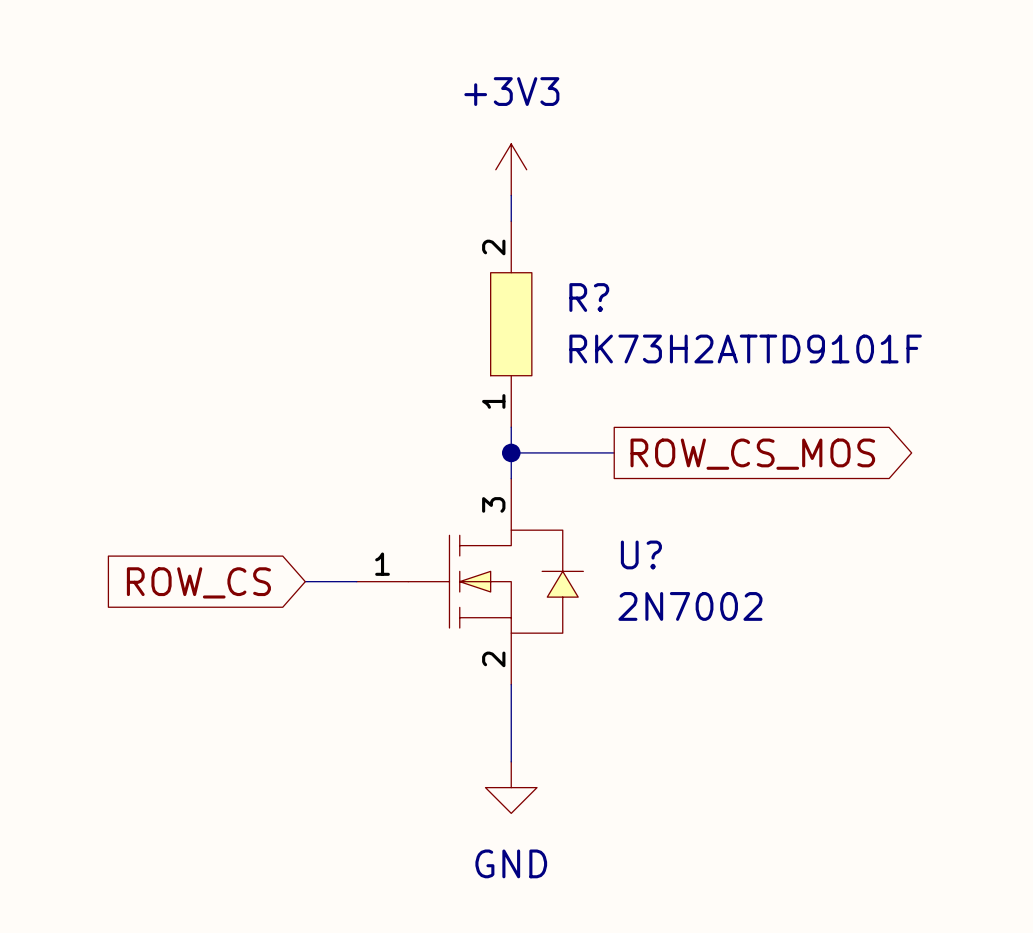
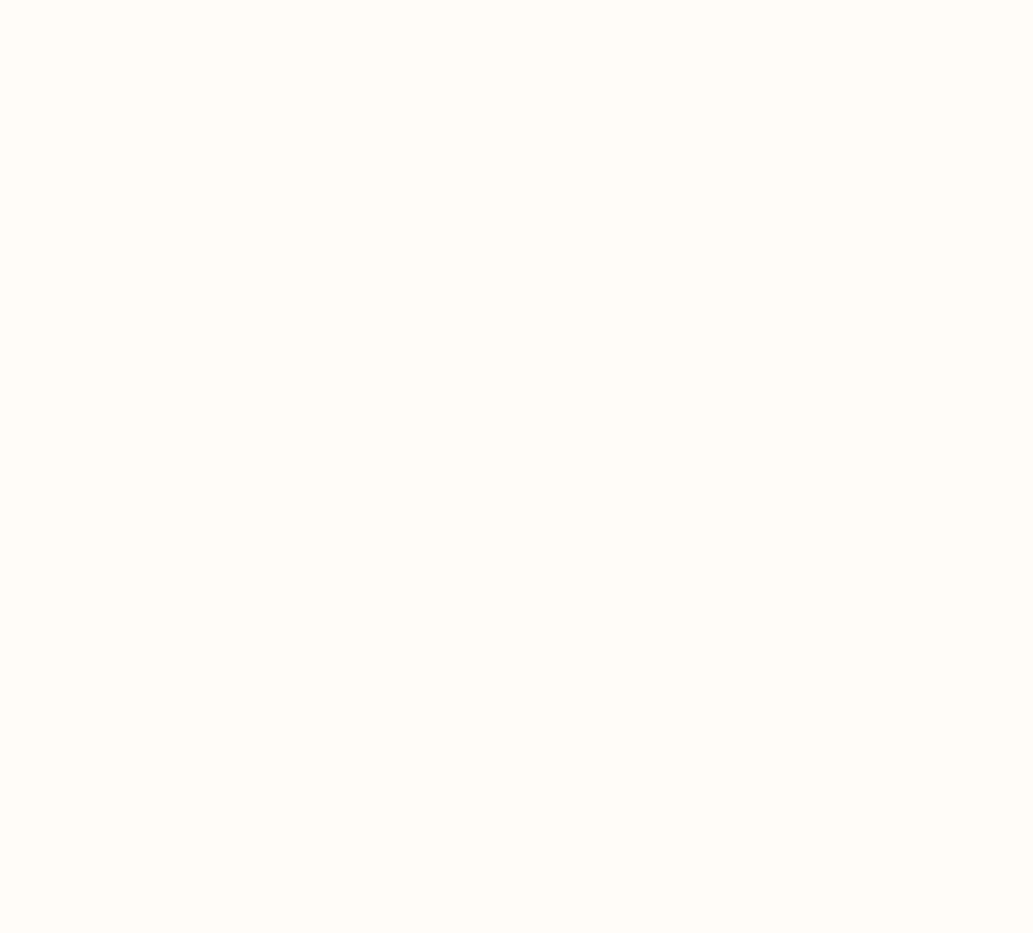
power symbol: +3V3 (511, 169) -> none
wire: (511, 195) (511, 221) -> none
R?: RK73H2ATTD9101F (511, 324) -> none
wire: (511, 427) (511, 478) -> none
wire: (511, 452) (614, 452) -> none
junction: (511, 452) -> none
global label: ROW_CS_MOS (752, 454) -> none
wire: (305, 581) (356, 581) -> none
U?: 2N7002 (470, 581) -> none
global label: ROW_CS (198, 582) -> none
wire: (511, 684) (511, 761) -> none
power symbol: GND (511, 787) -> none

